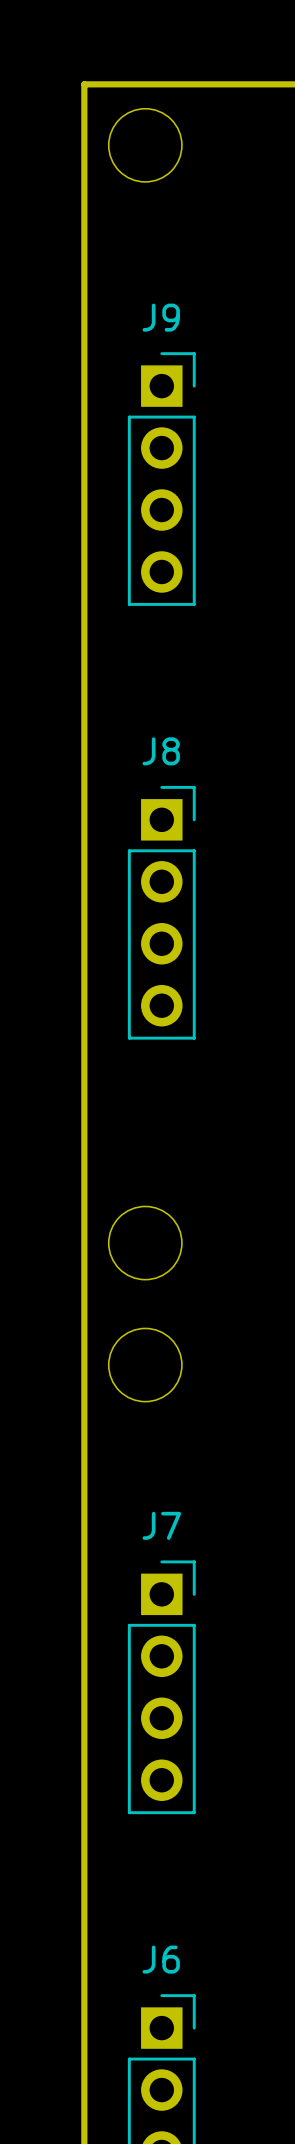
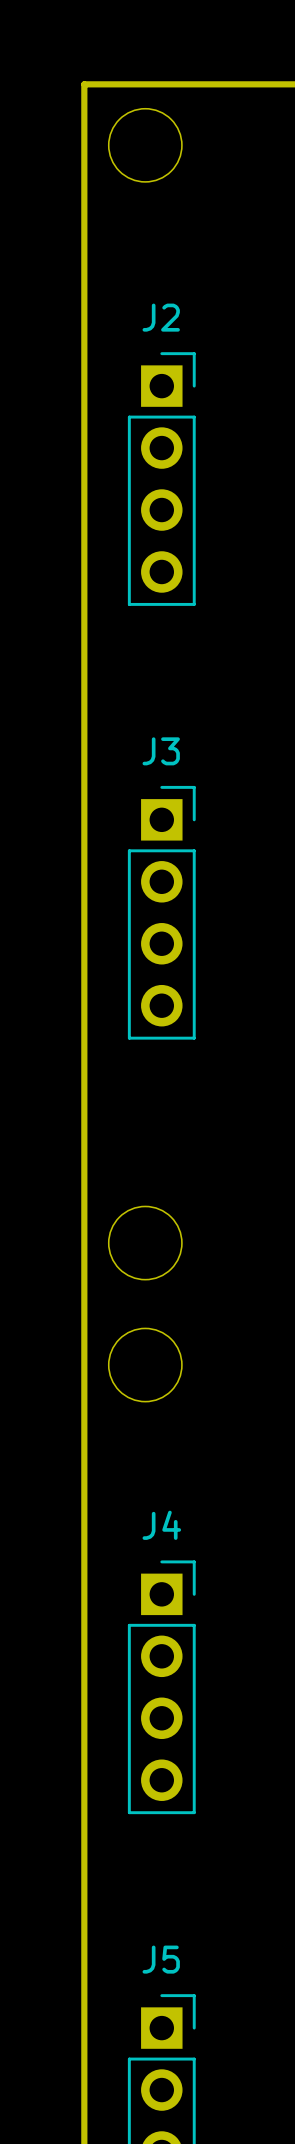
J9 name: J9 (161, 317) -> J2 (161, 317)
J8 name: J8 (161, 751) -> J3 (161, 751)
J7 name: J7 (161, 1525) -> J4 (161, 1525)
J6 name: J6 (161, 1959) -> J5 (161, 1959)

